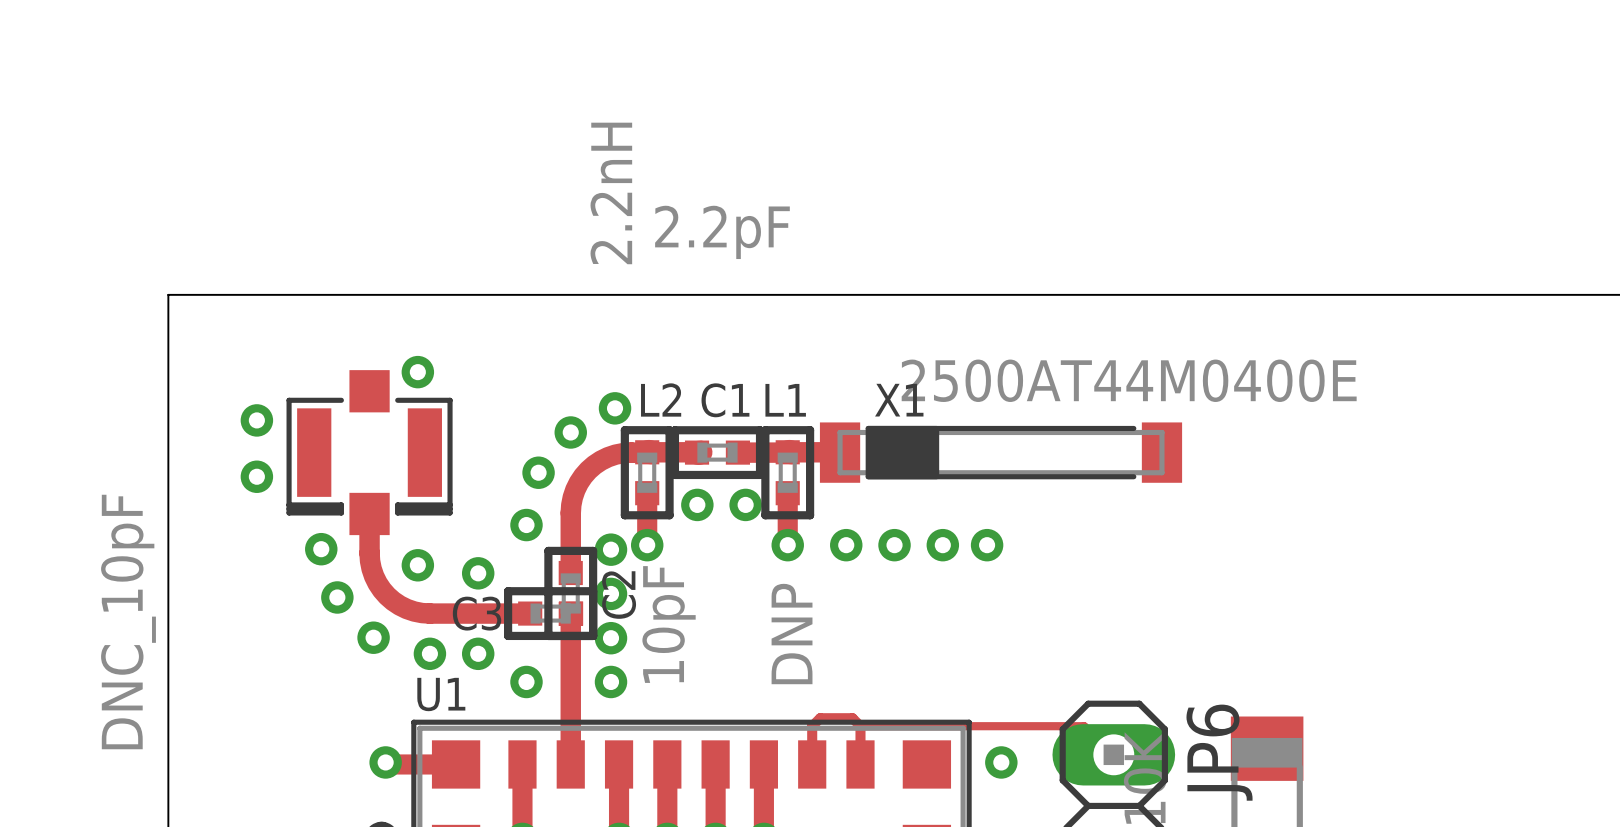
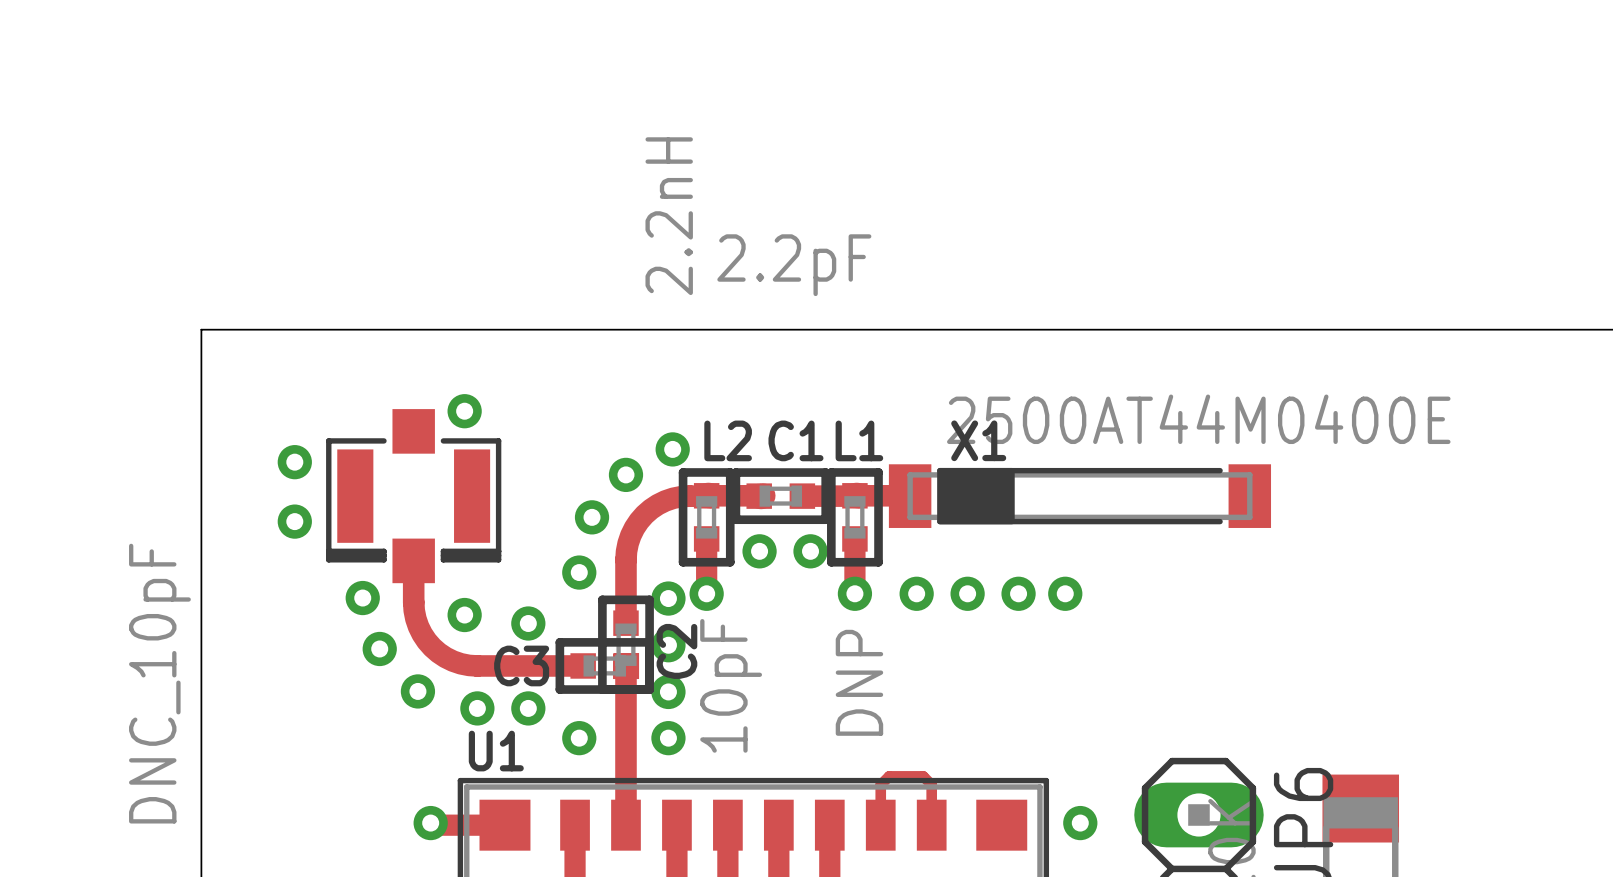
top track: (860, 726) (1084, 726) (1113, 754) -> none

